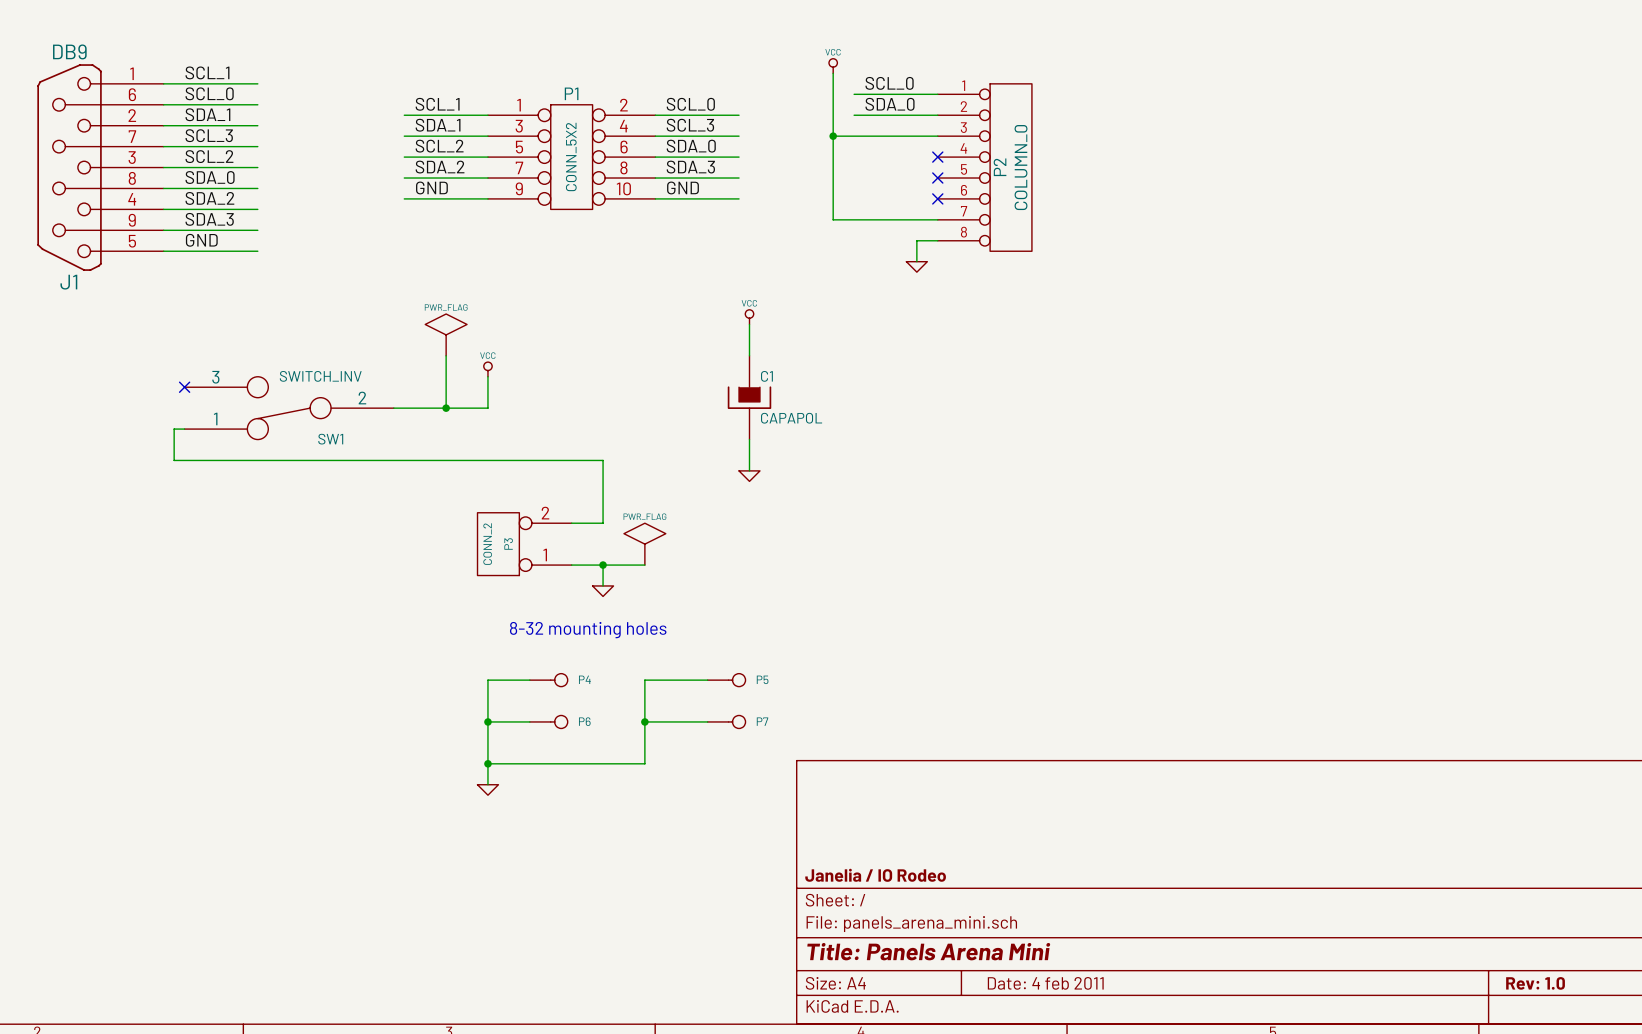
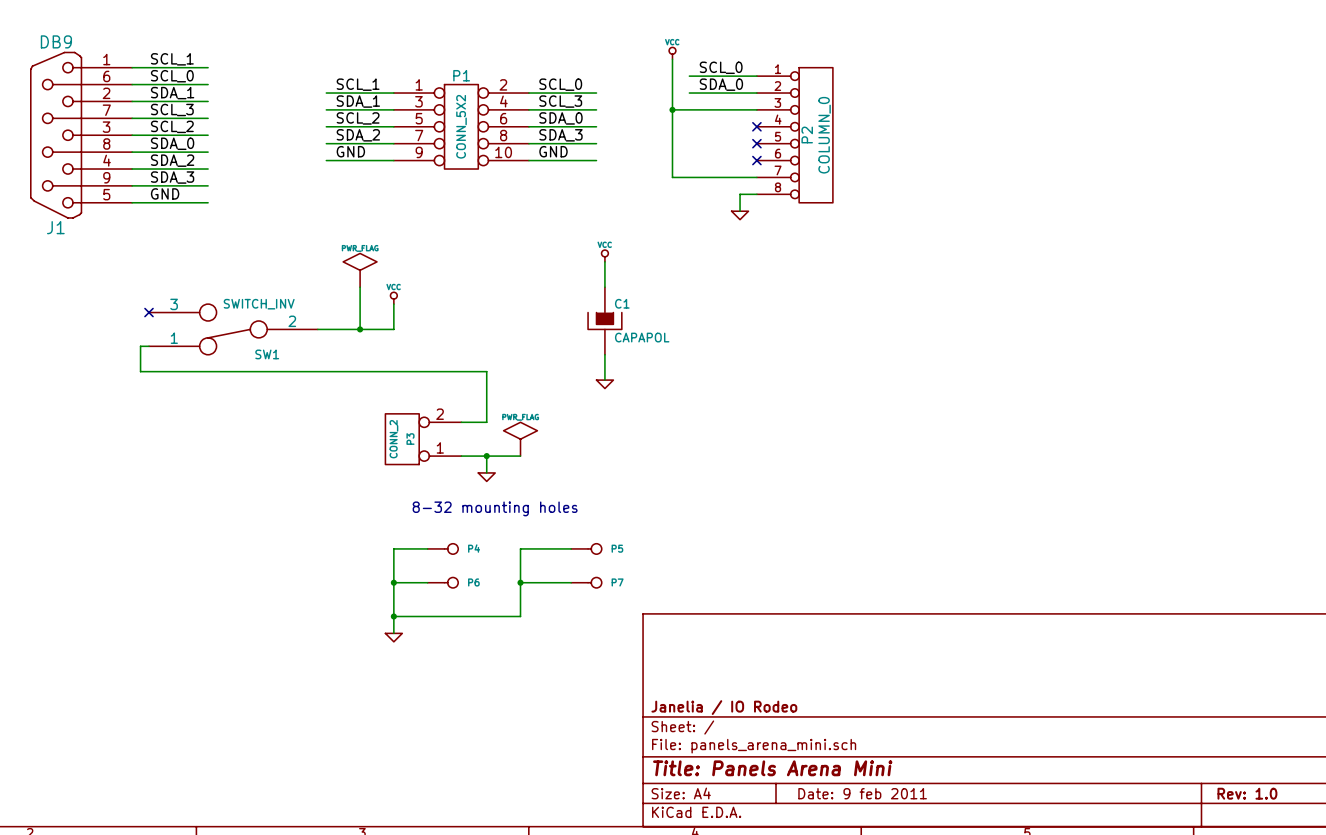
title block: Date: 4 feb 2011 (1045, 983) -> Date: 9 feb 2011 (862, 793)

